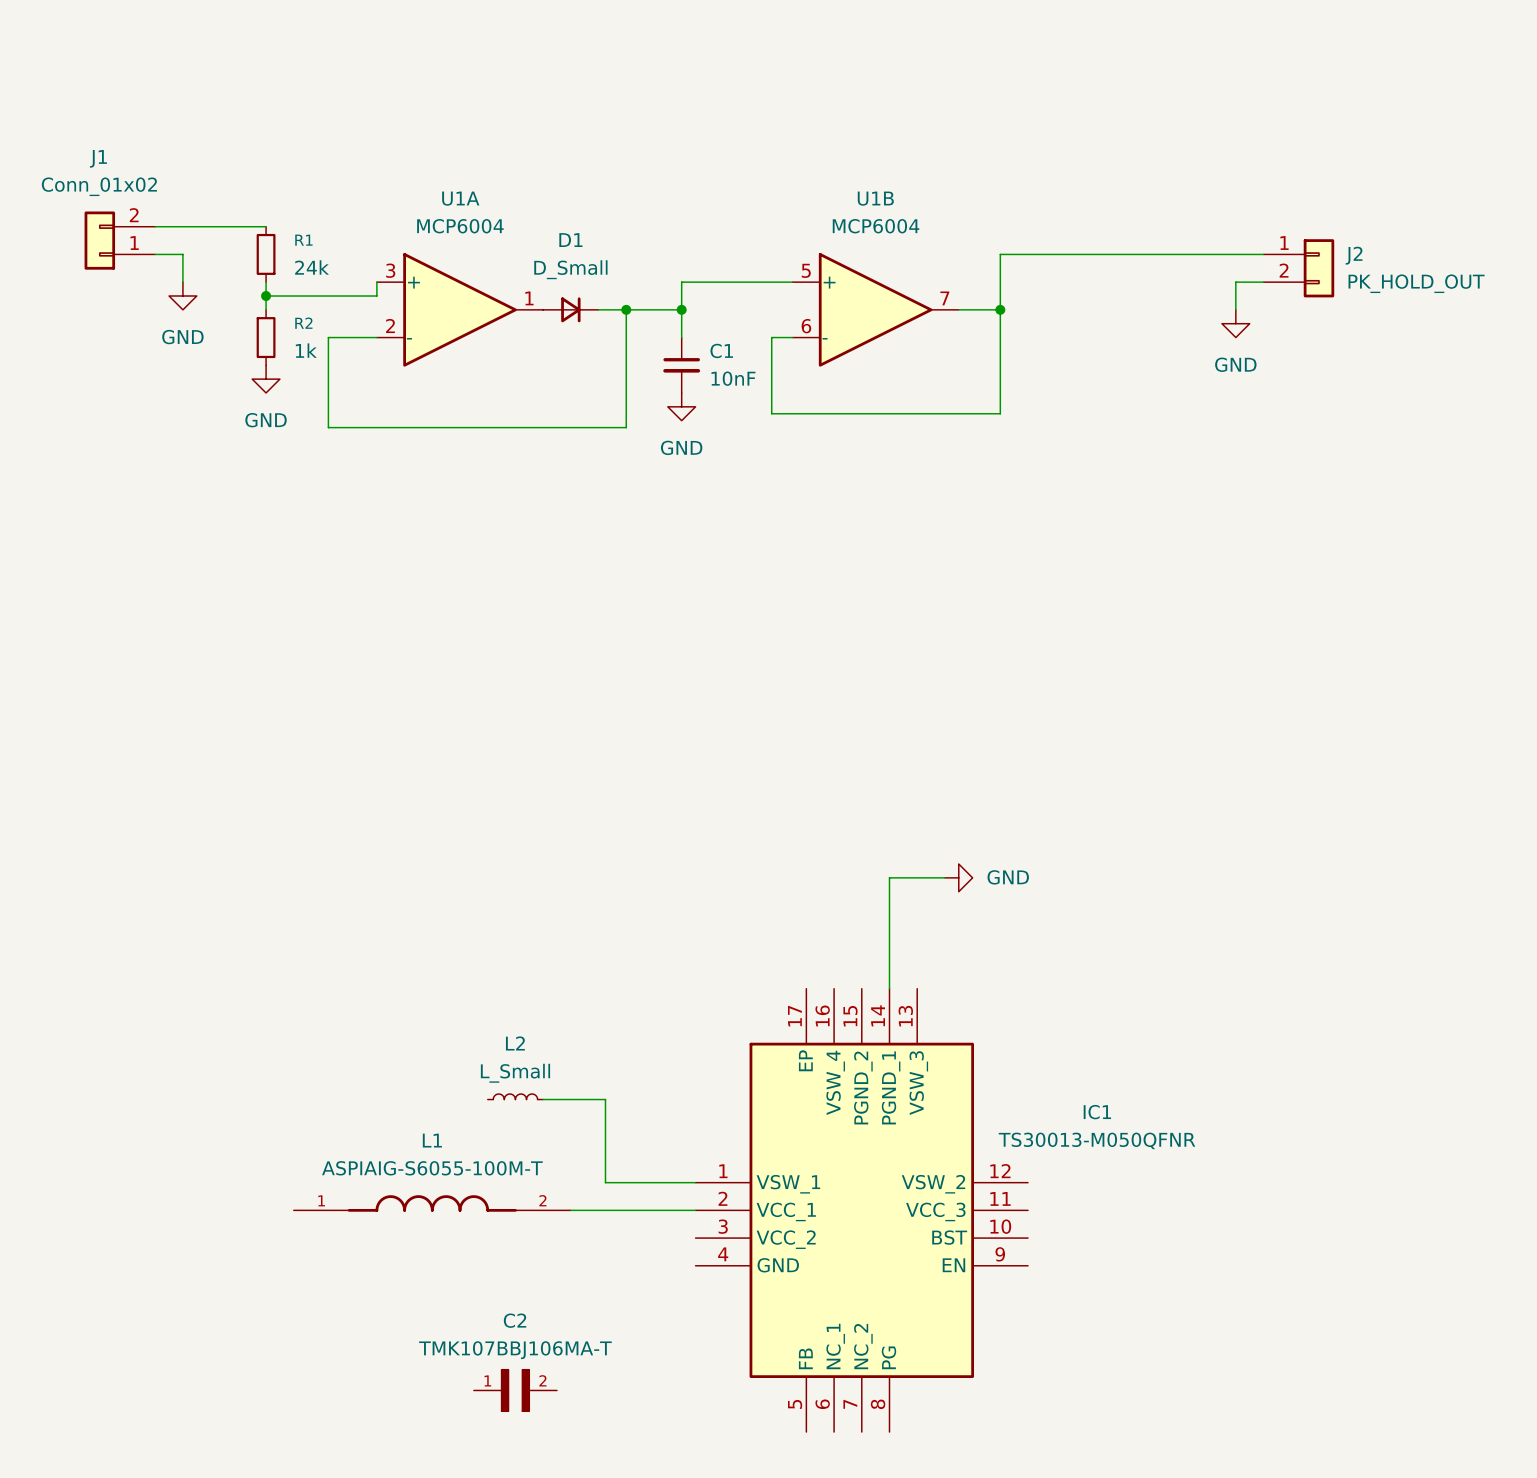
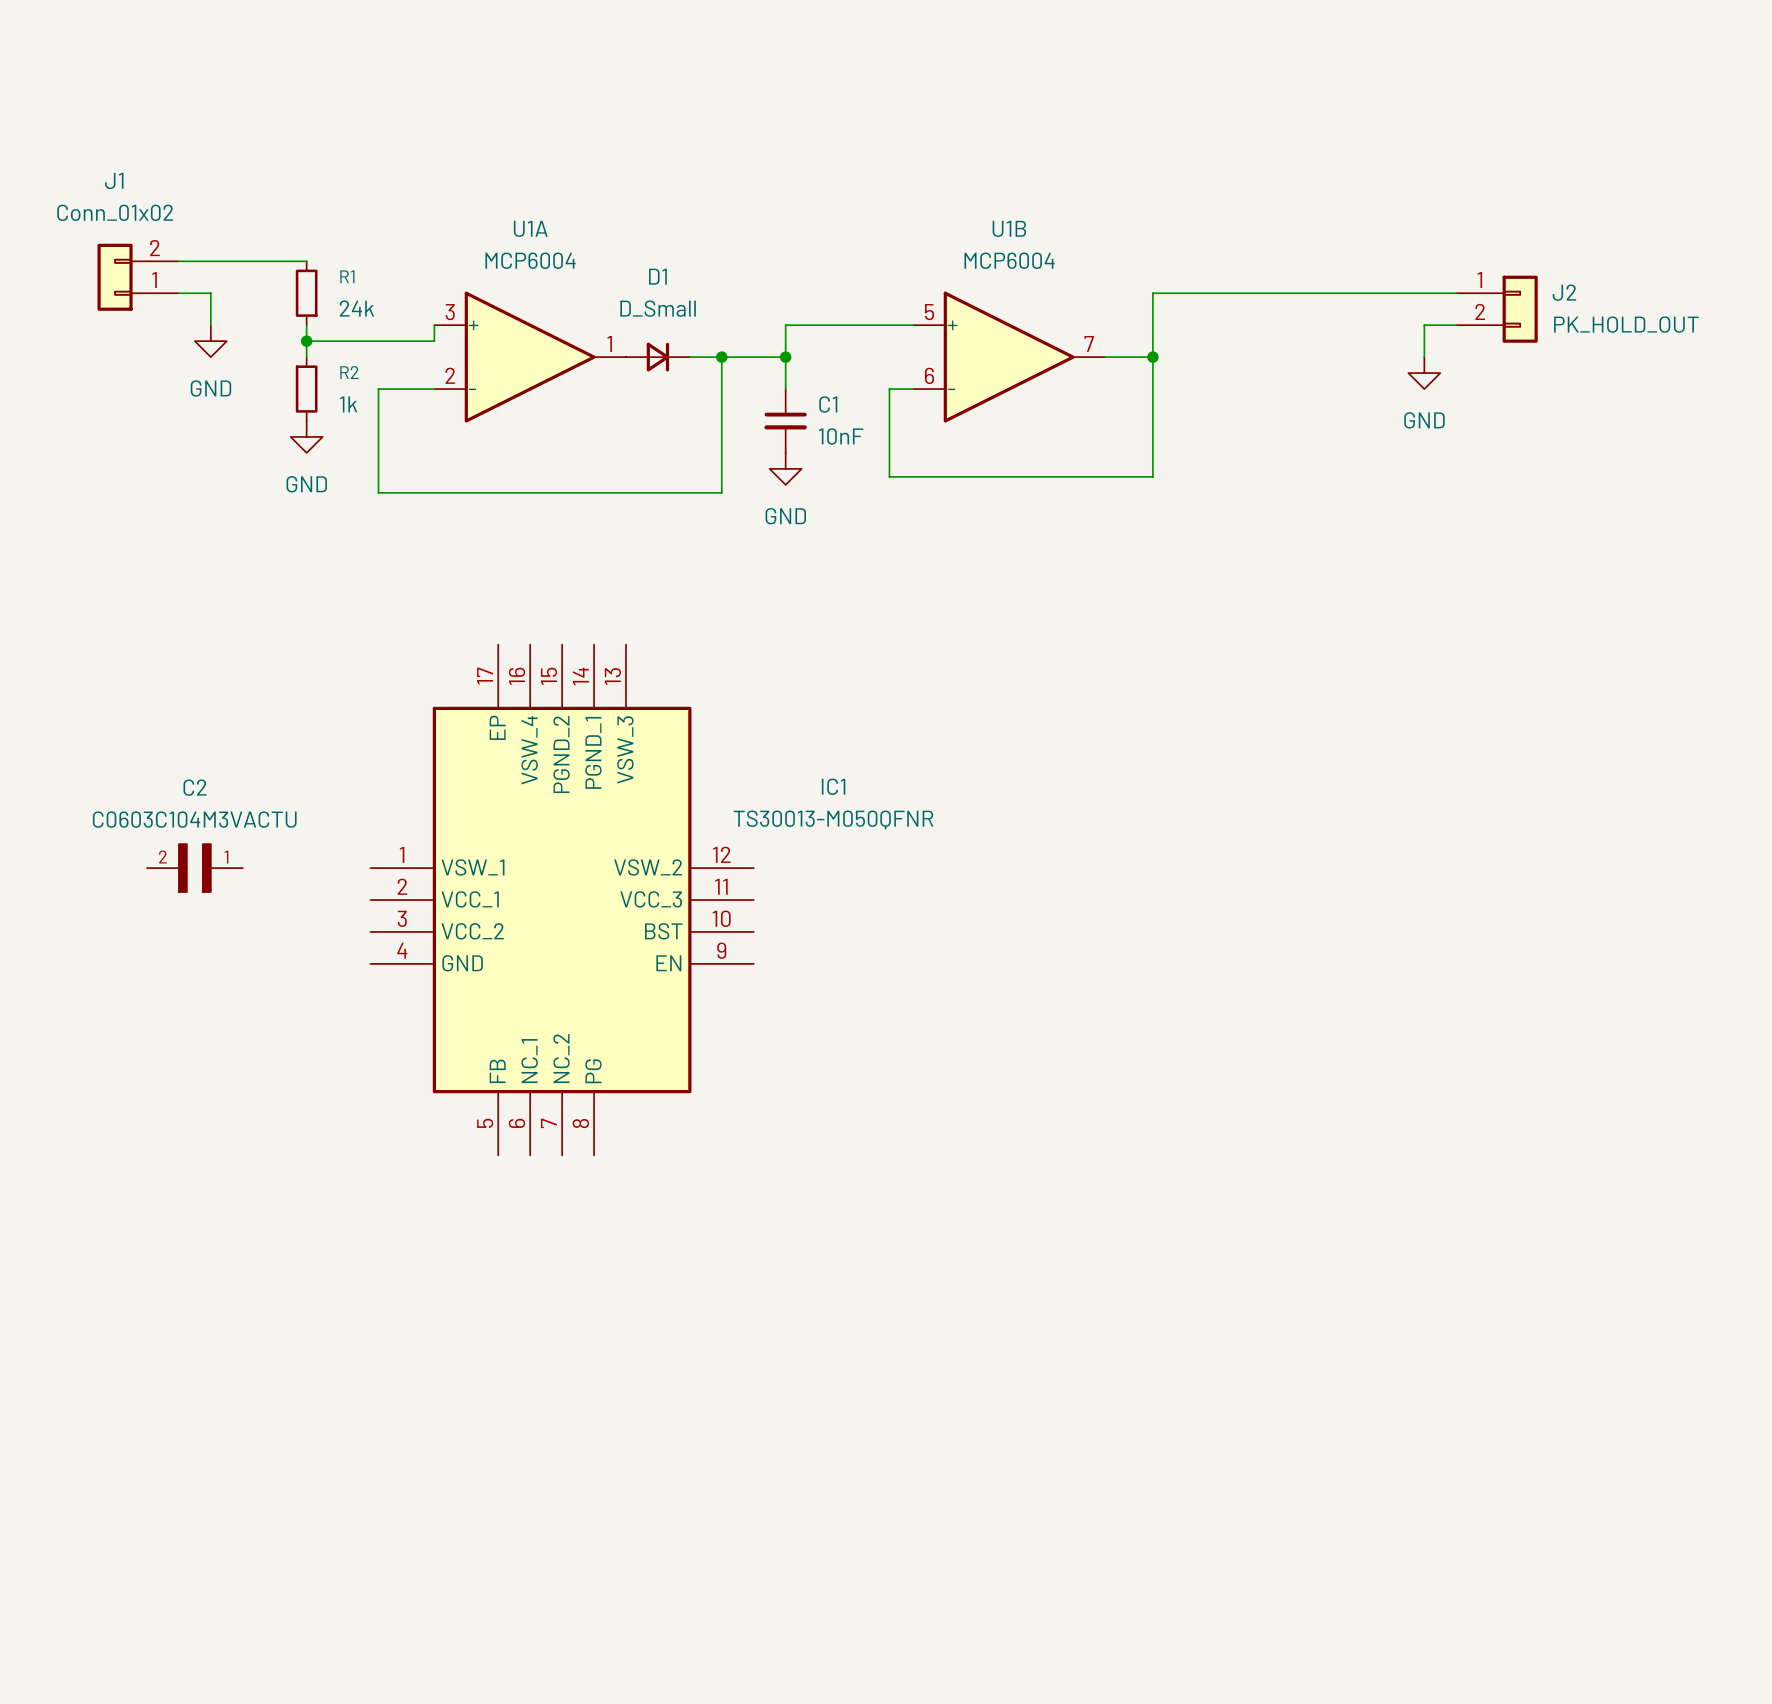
wire: (944, 877) (889, 877) (889, 988) -> none
power symbol: GND (958, 877) -> none
L2: L_Small (515, 1096) -> none
wire: (543, 1099) (605, 1099) (605, 1182) (695, 1182) -> none
L1: ASPIAIG-S6055-100M-T (432, 1203) -> none
wire: (570, 1210) (695, 1210) -> none
IC1 position: (861, 1210) -> (562, 900)
C2 value: TMK107BBJ106MA-T (515, 1350) -> C0603C104M3VACTU (194, 819)
C2 rotation: 0° (515, 1390) -> 180° (194, 868)
C2 position: (515, 1390) -> (194, 868)

